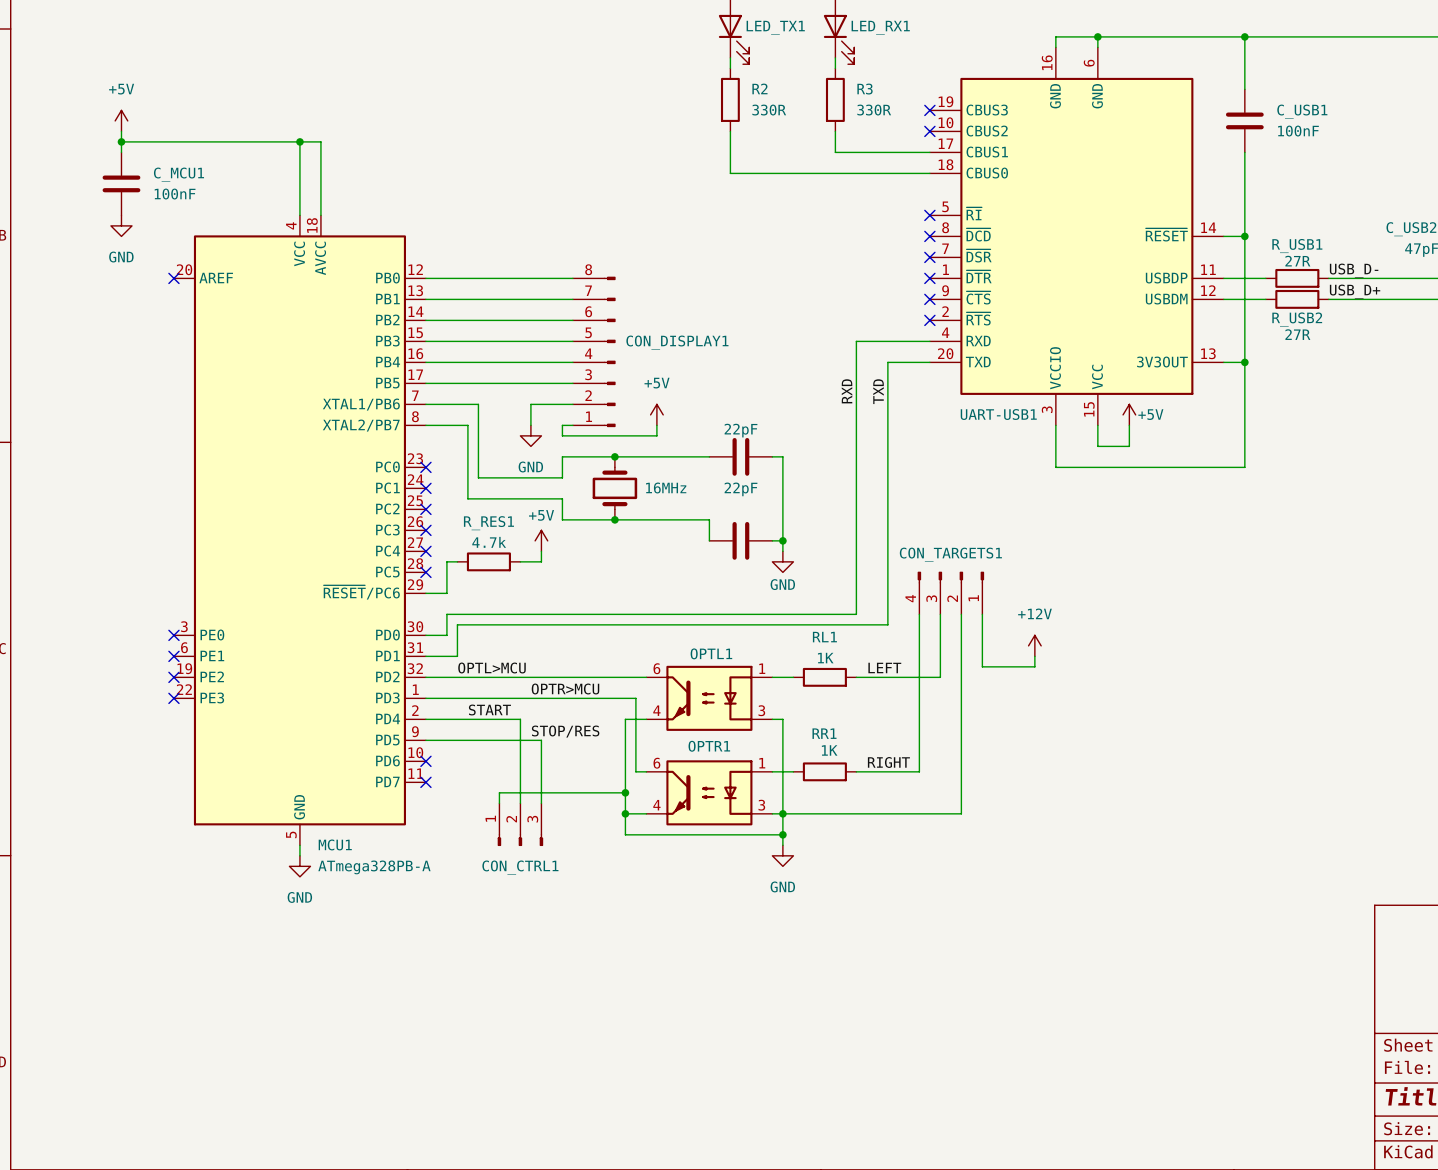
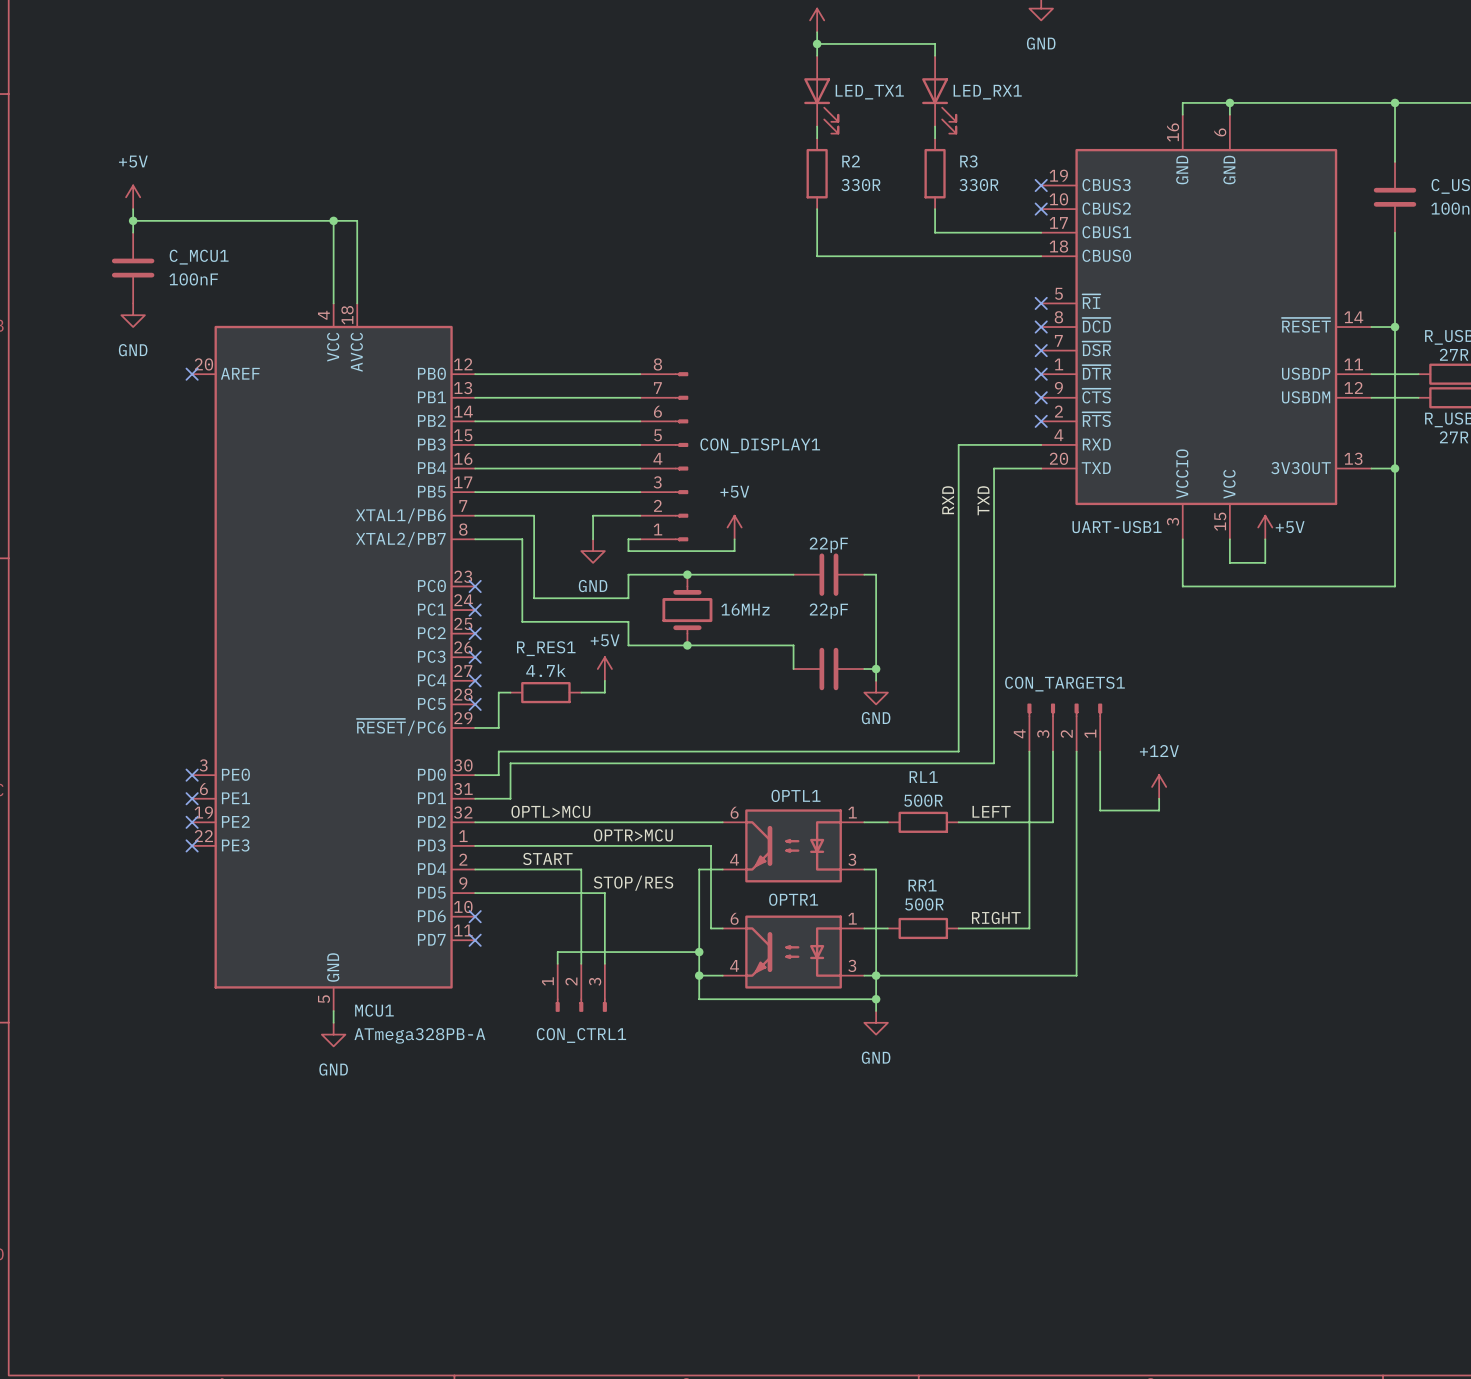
RL1 value: 1K (825, 658) -> 500R (923, 800)
RR1 value: 1K (829, 750) -> 500R (924, 904)

